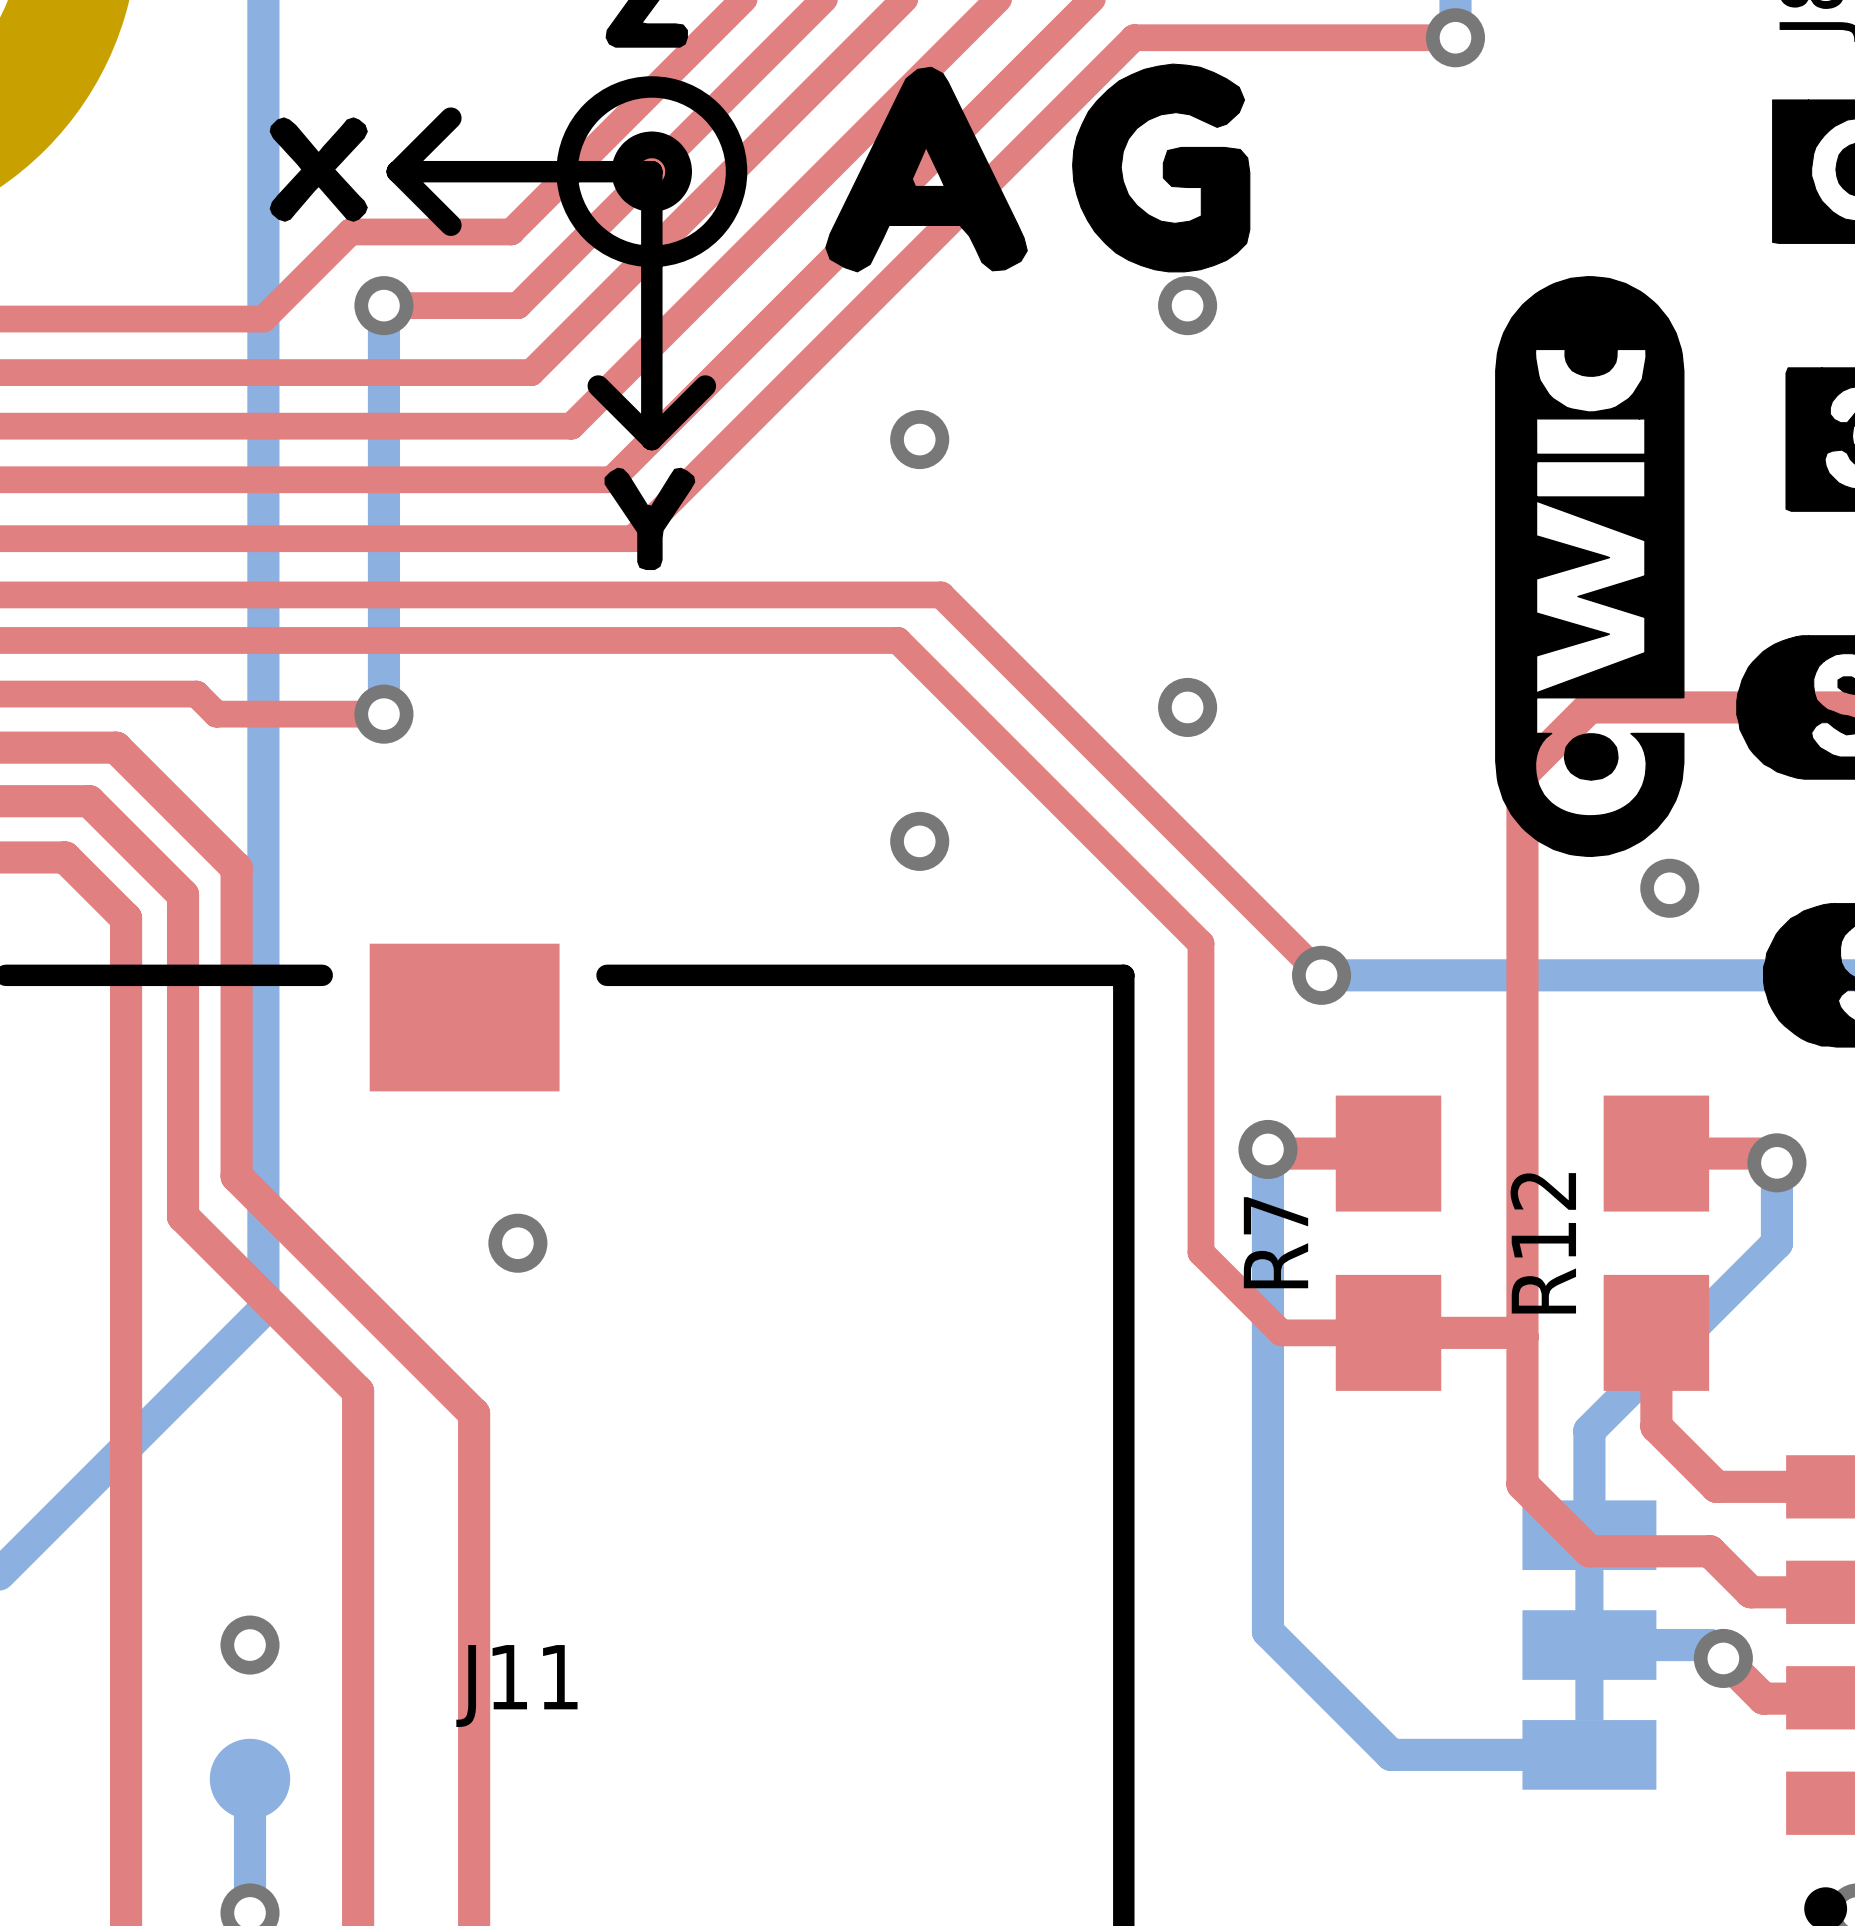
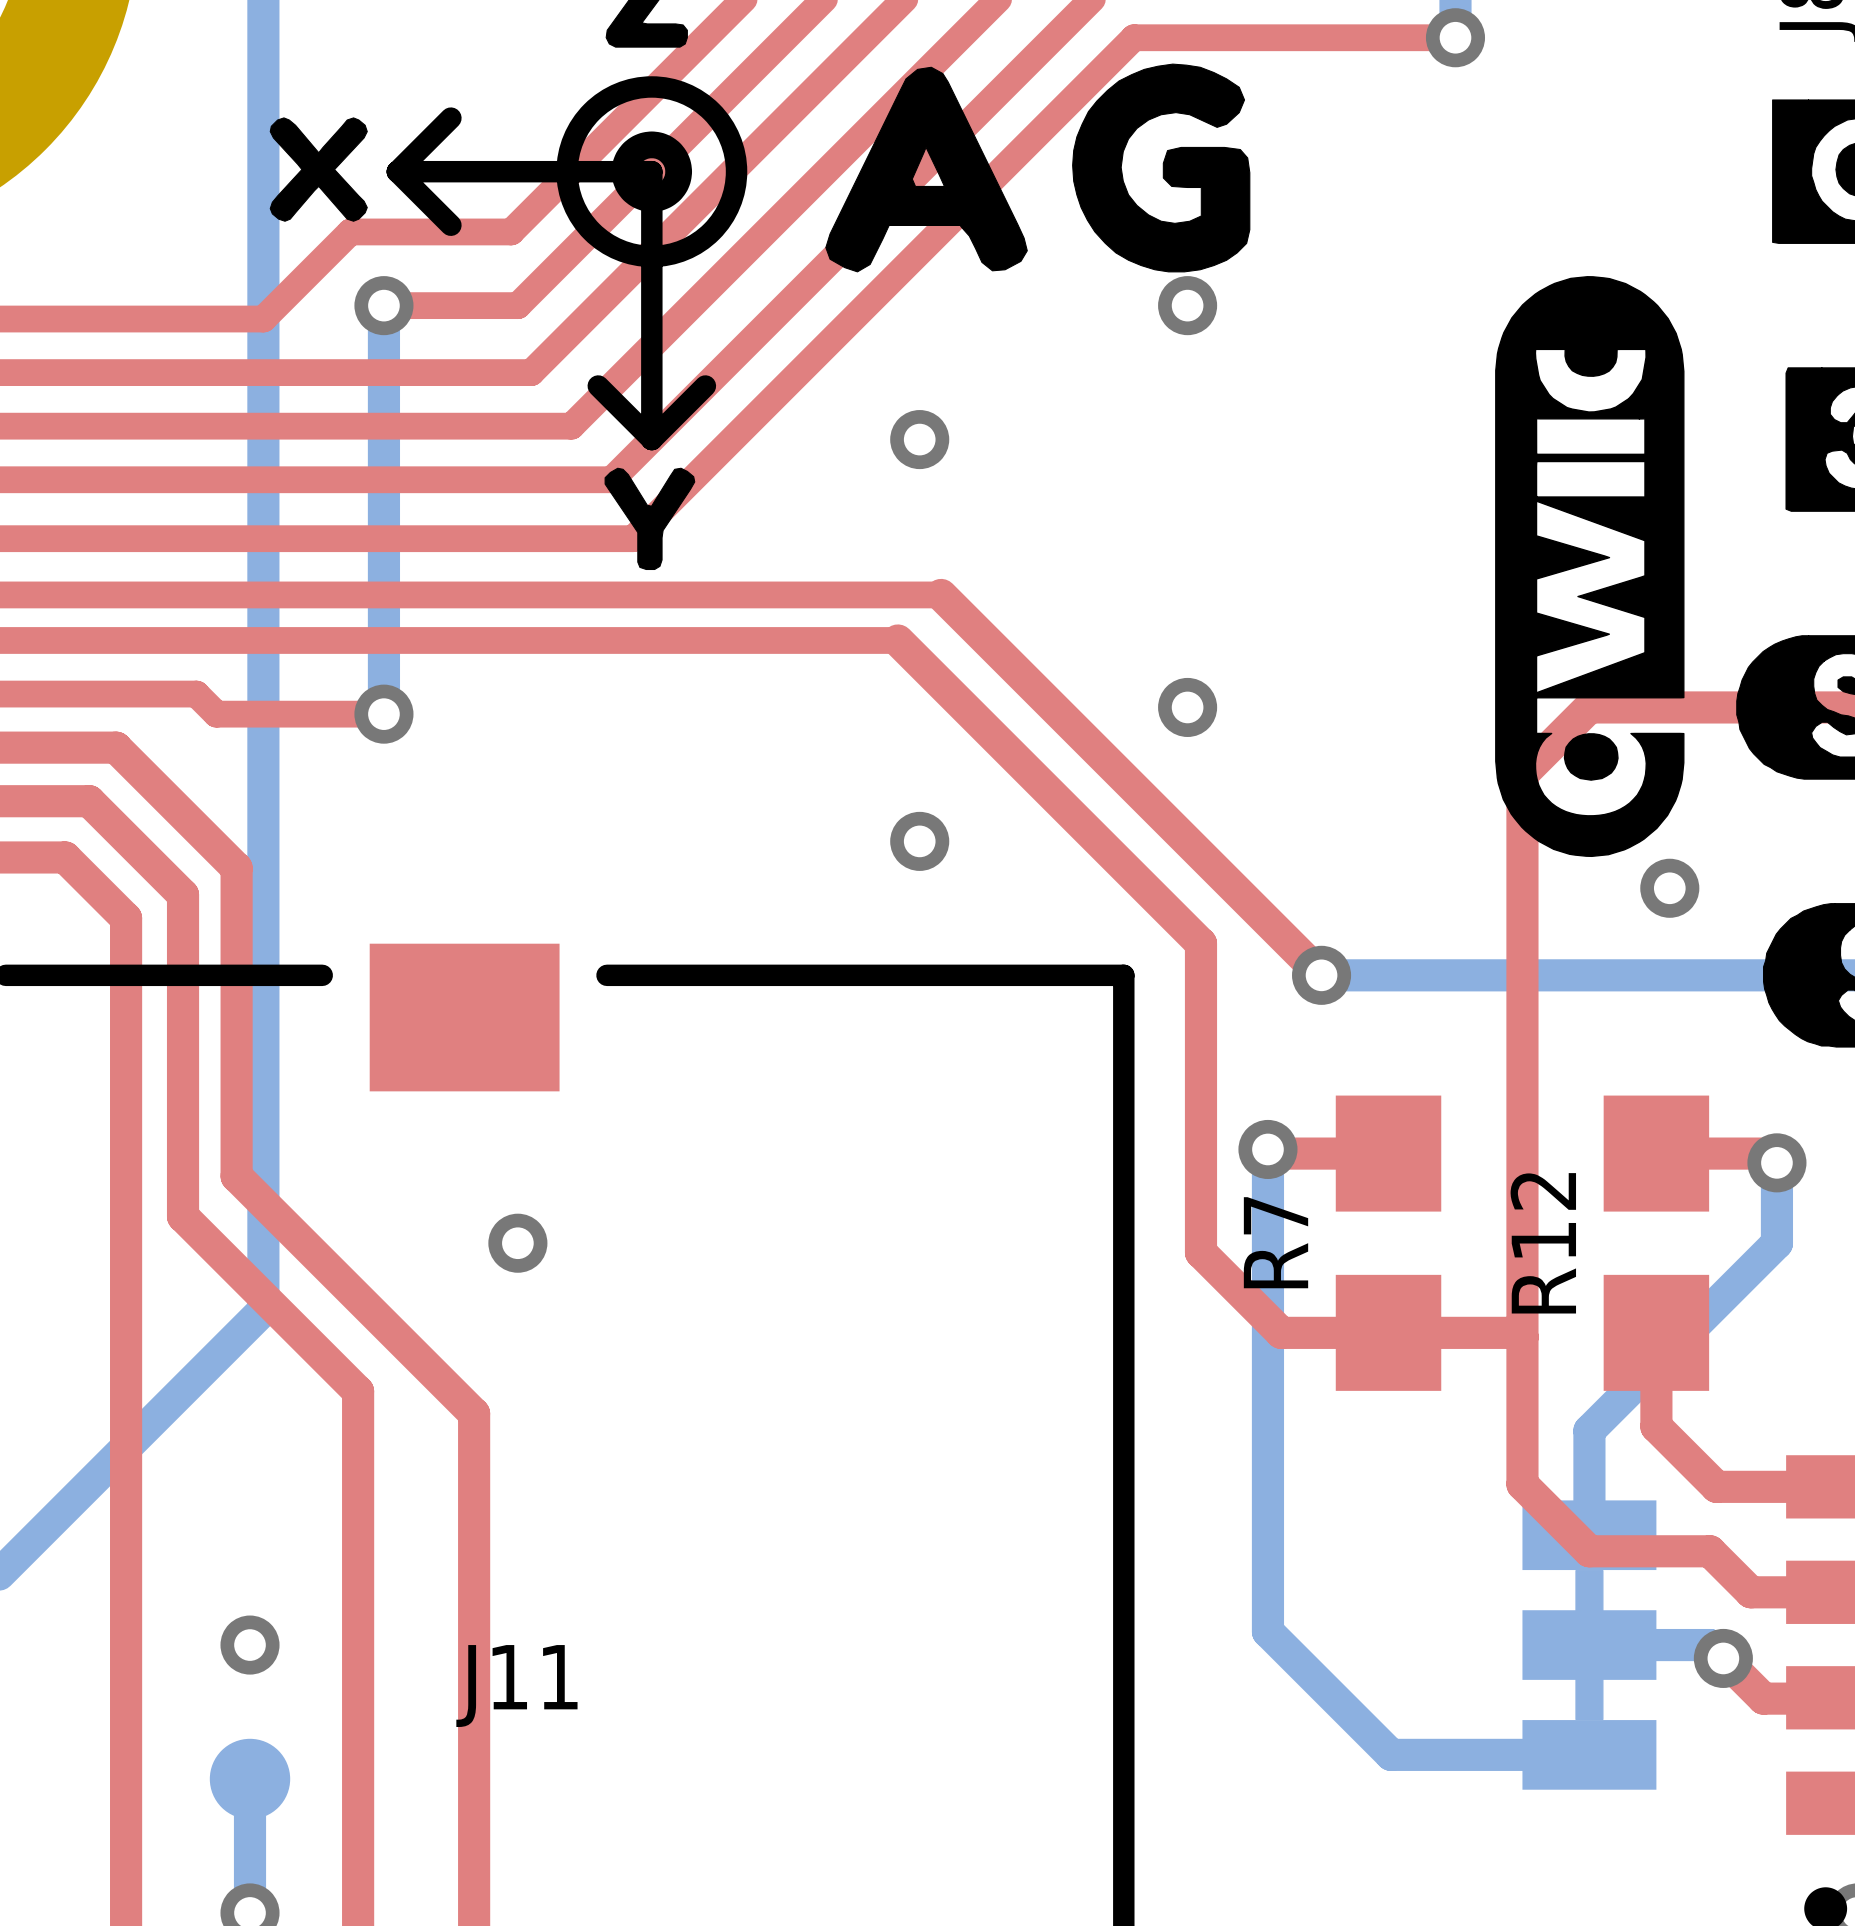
top track width: thin (941, 594) (1321, 975) -> thick (941, 594) (1321, 975)
top track width: thin (897, 640) (1200, 943) (1200, 1252) (1281, 1332) (1388, 1332) -> thick (897, 640) (1200, 943) (1200, 1252) (1281, 1332) (1388, 1332)

